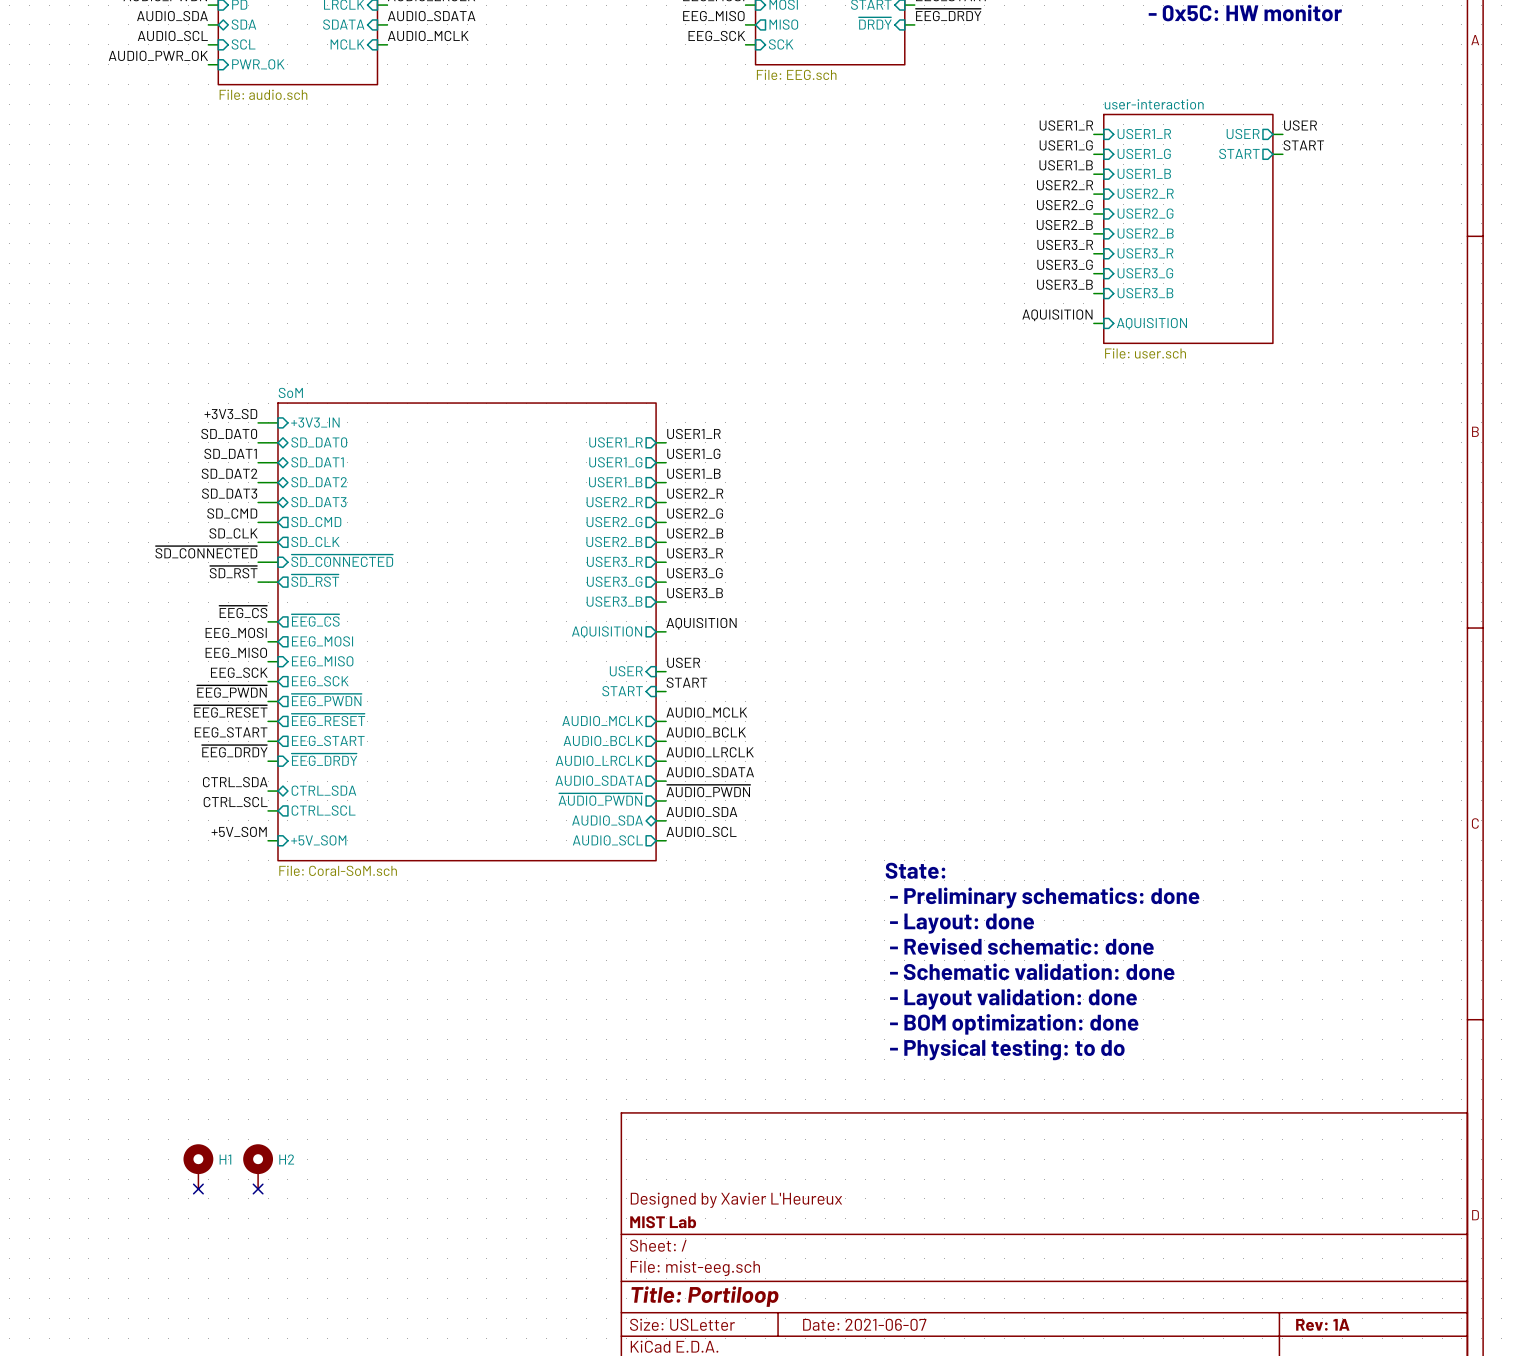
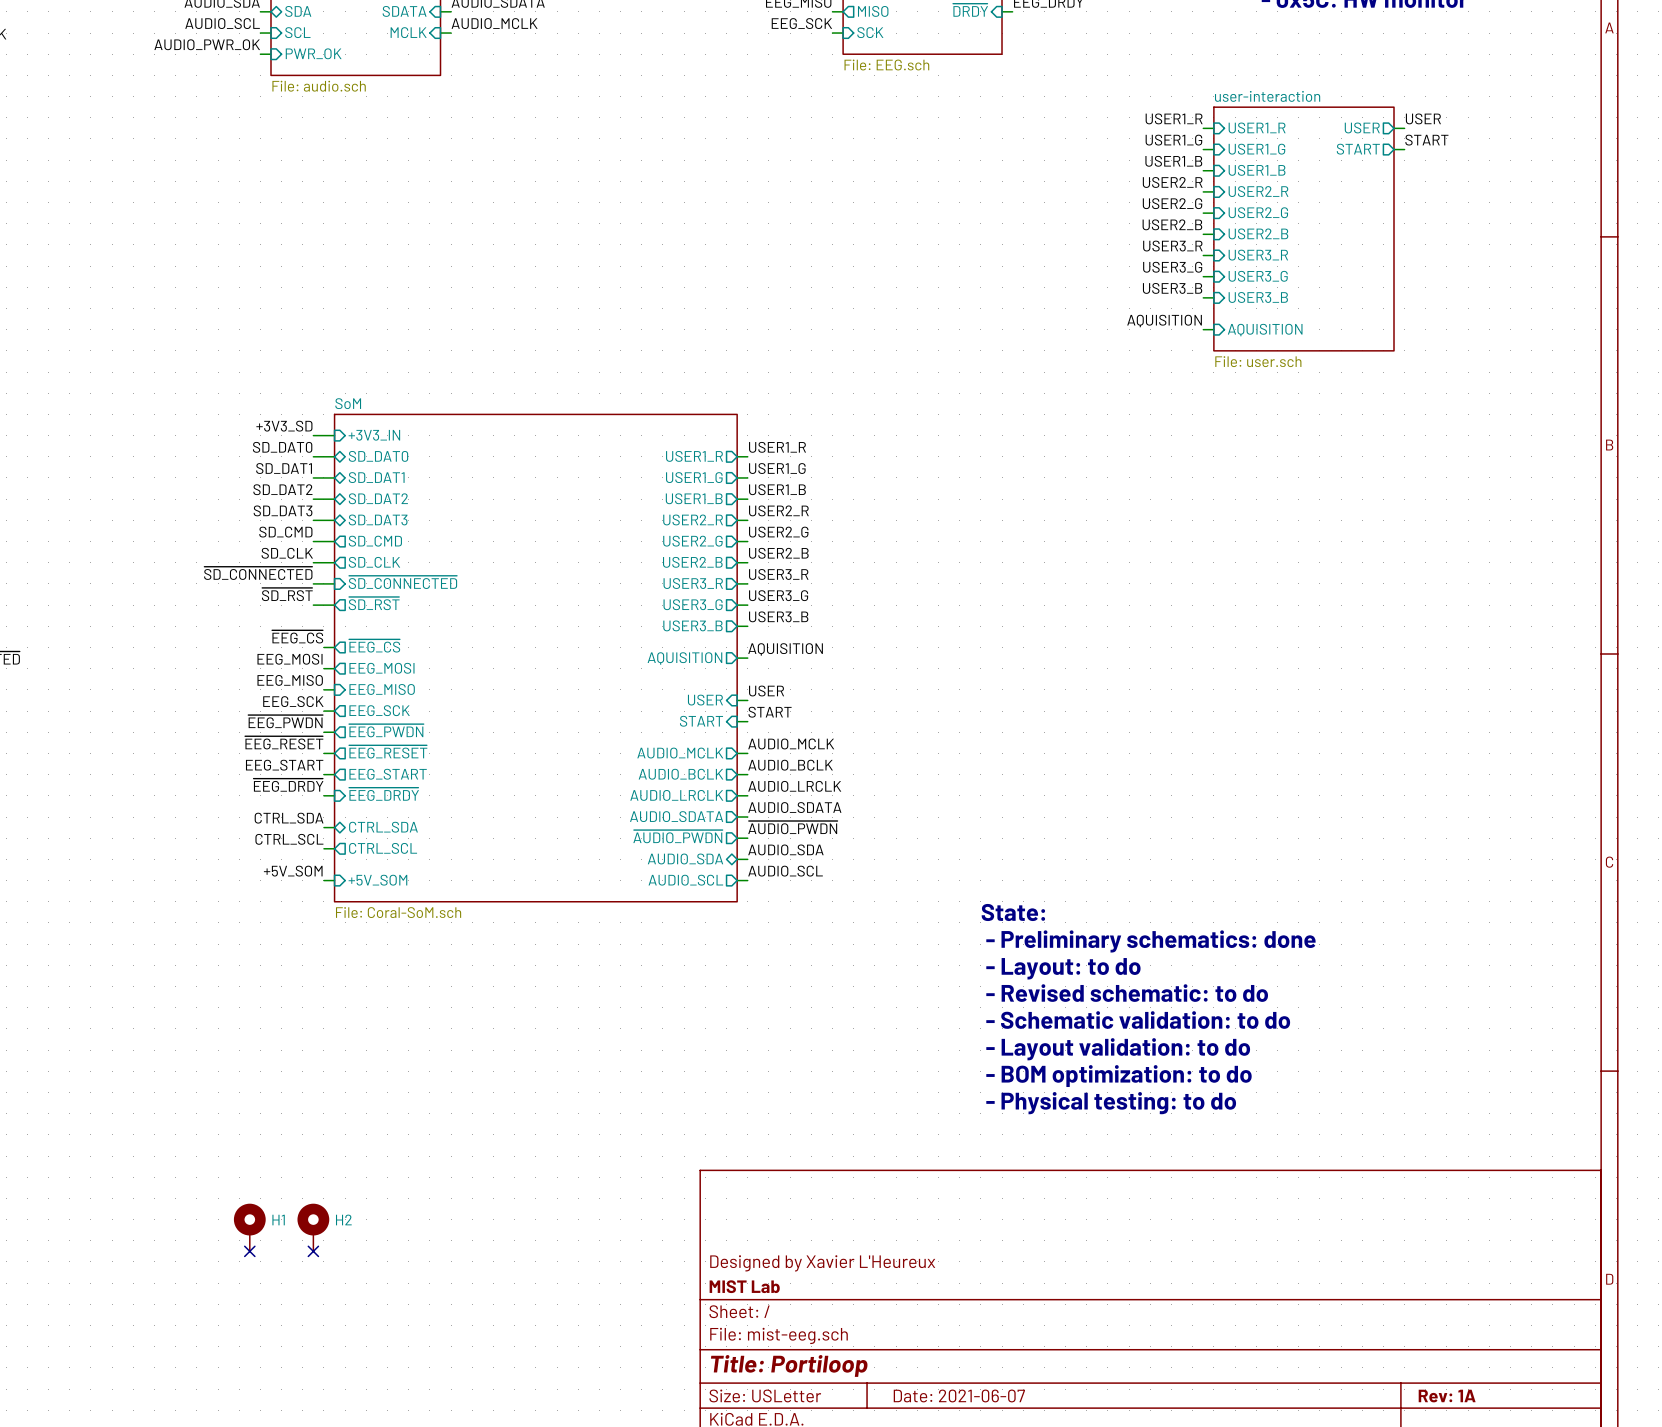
text: - Layout: done (962, 923) -> - Layout: to do (1063, 968)
text: - Revised schematic: done (1021, 946) -> - Revised schematic: to do (1127, 993)
text: - Schematic validation: done (1032, 971) -> - Schematic validation: to do (1138, 1020)
text: - Layout validation: done (1013, 999) -> - Layout validation: to do (1118, 1049)
text: - BOM optimization: done (1014, 1024) -> - BOM optimization: to do (1118, 1076)

